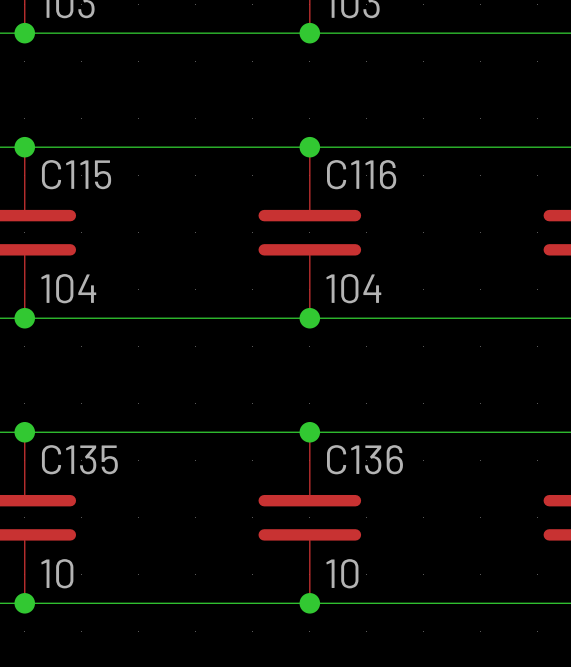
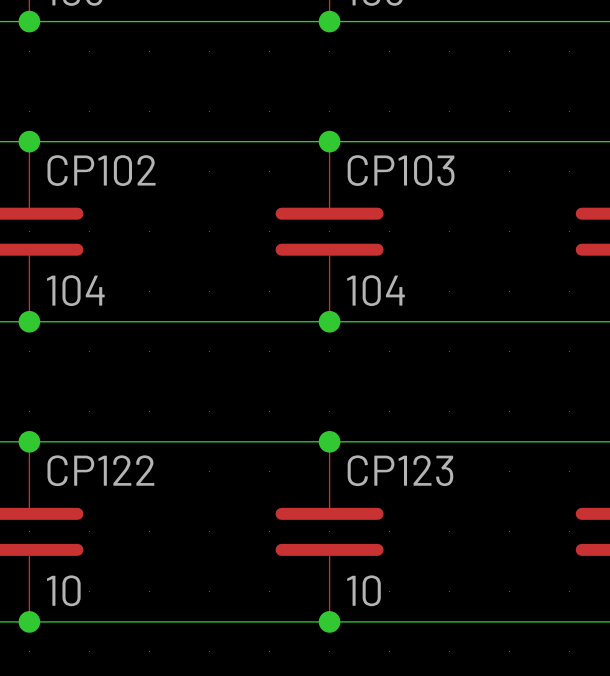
C115 name: C115 (76, 174) -> CP102 (101, 170)
C116 name: C116 (361, 174) -> CP103 (401, 170)
C135 name: C135 (79, 459) -> CP122 (100, 470)
C136 name: C136 (364, 459) -> CP123 (400, 470)

